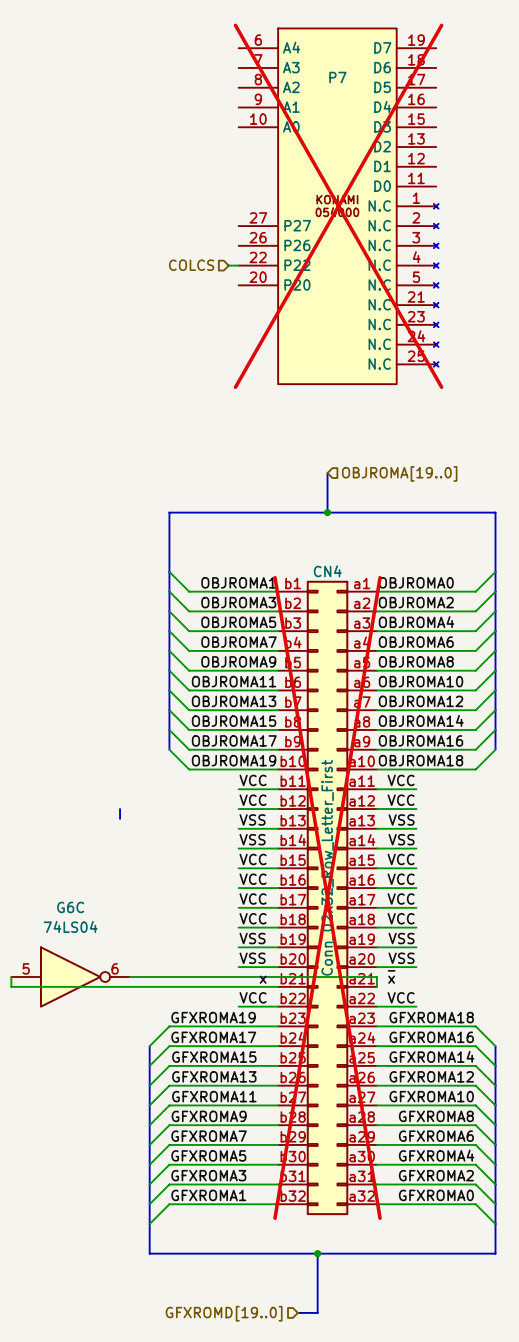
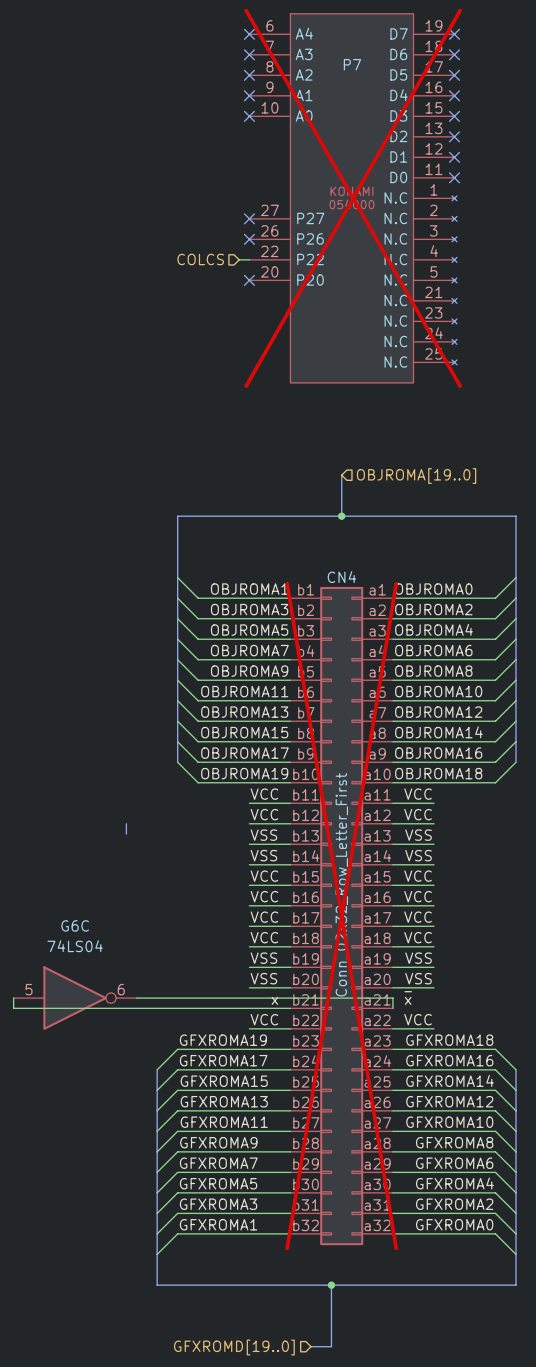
no-connect mark: none -> (249, 34)
no-connect mark: none -> (454, 34)
no-connect mark: none -> (249, 54)
no-connect mark: none -> (454, 54)
no-connect mark: none -> (249, 75)
no-connect mark: none -> (454, 75)
no-connect mark: none -> (249, 95)
no-connect mark: none -> (454, 95)
no-connect mark: none -> (249, 116)
no-connect mark: none -> (454, 116)
no-connect mark: none -> (454, 136)
no-connect mark: none -> (454, 157)
no-connect mark: none -> (454, 177)
no-connect mark: none -> (249, 218)
no-connect mark: none -> (249, 239)
no-connect mark: none -> (249, 280)

